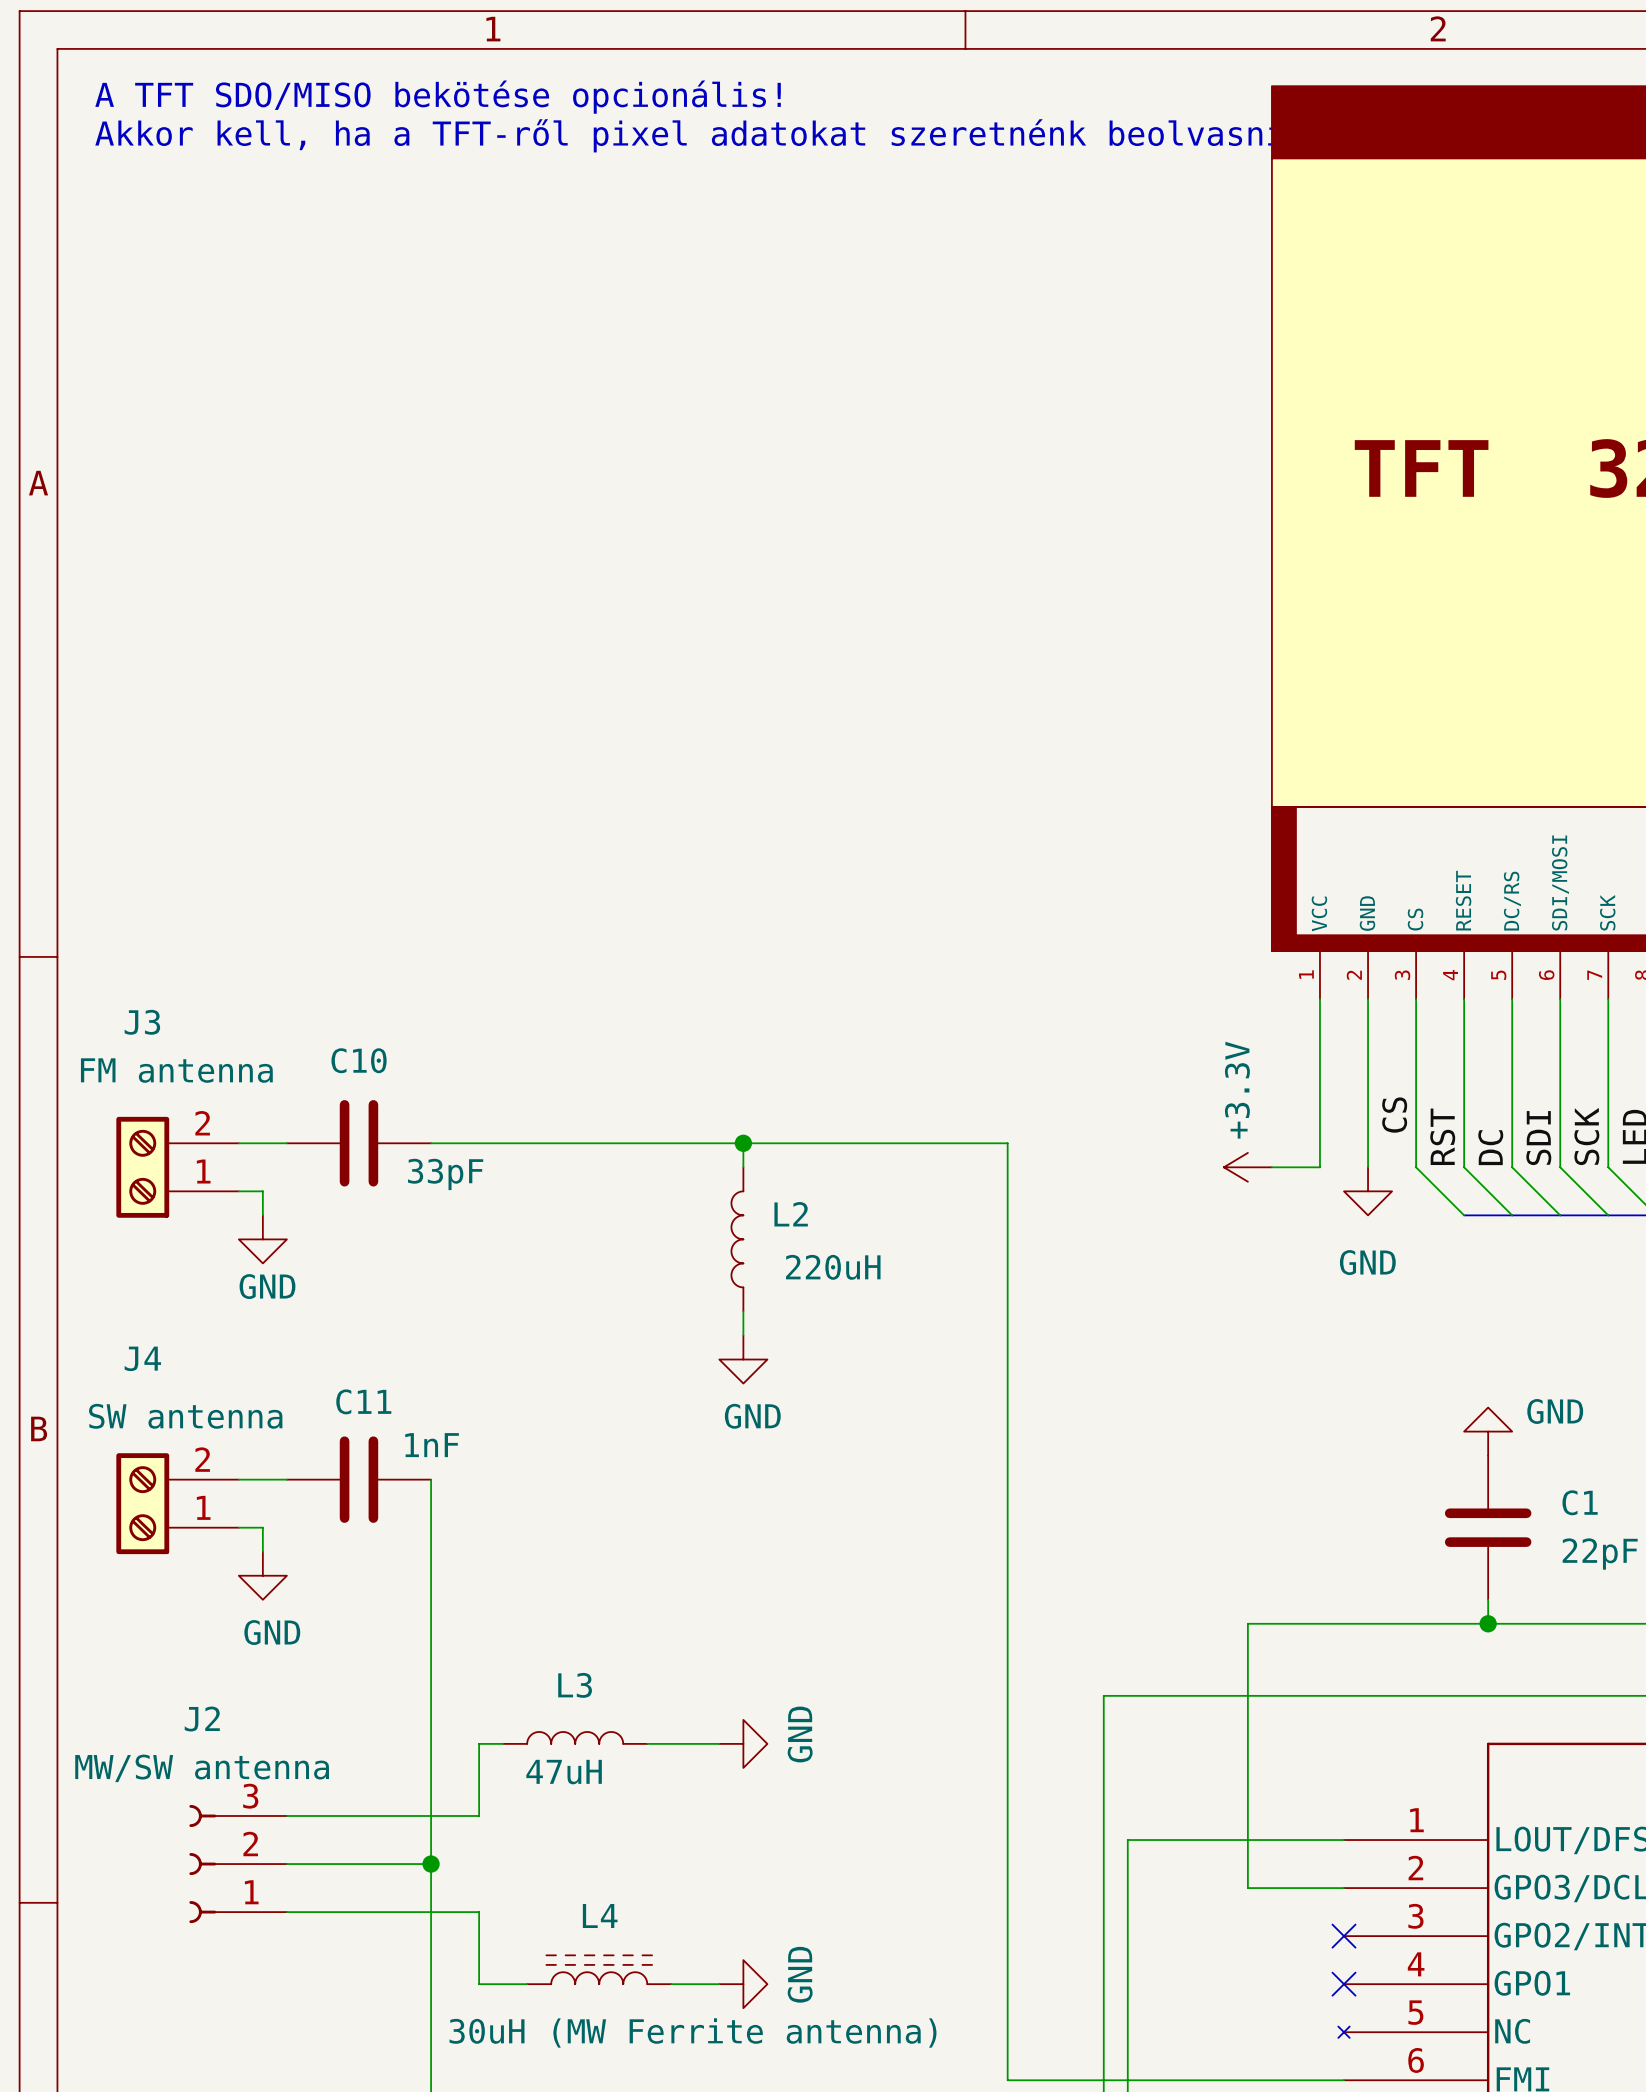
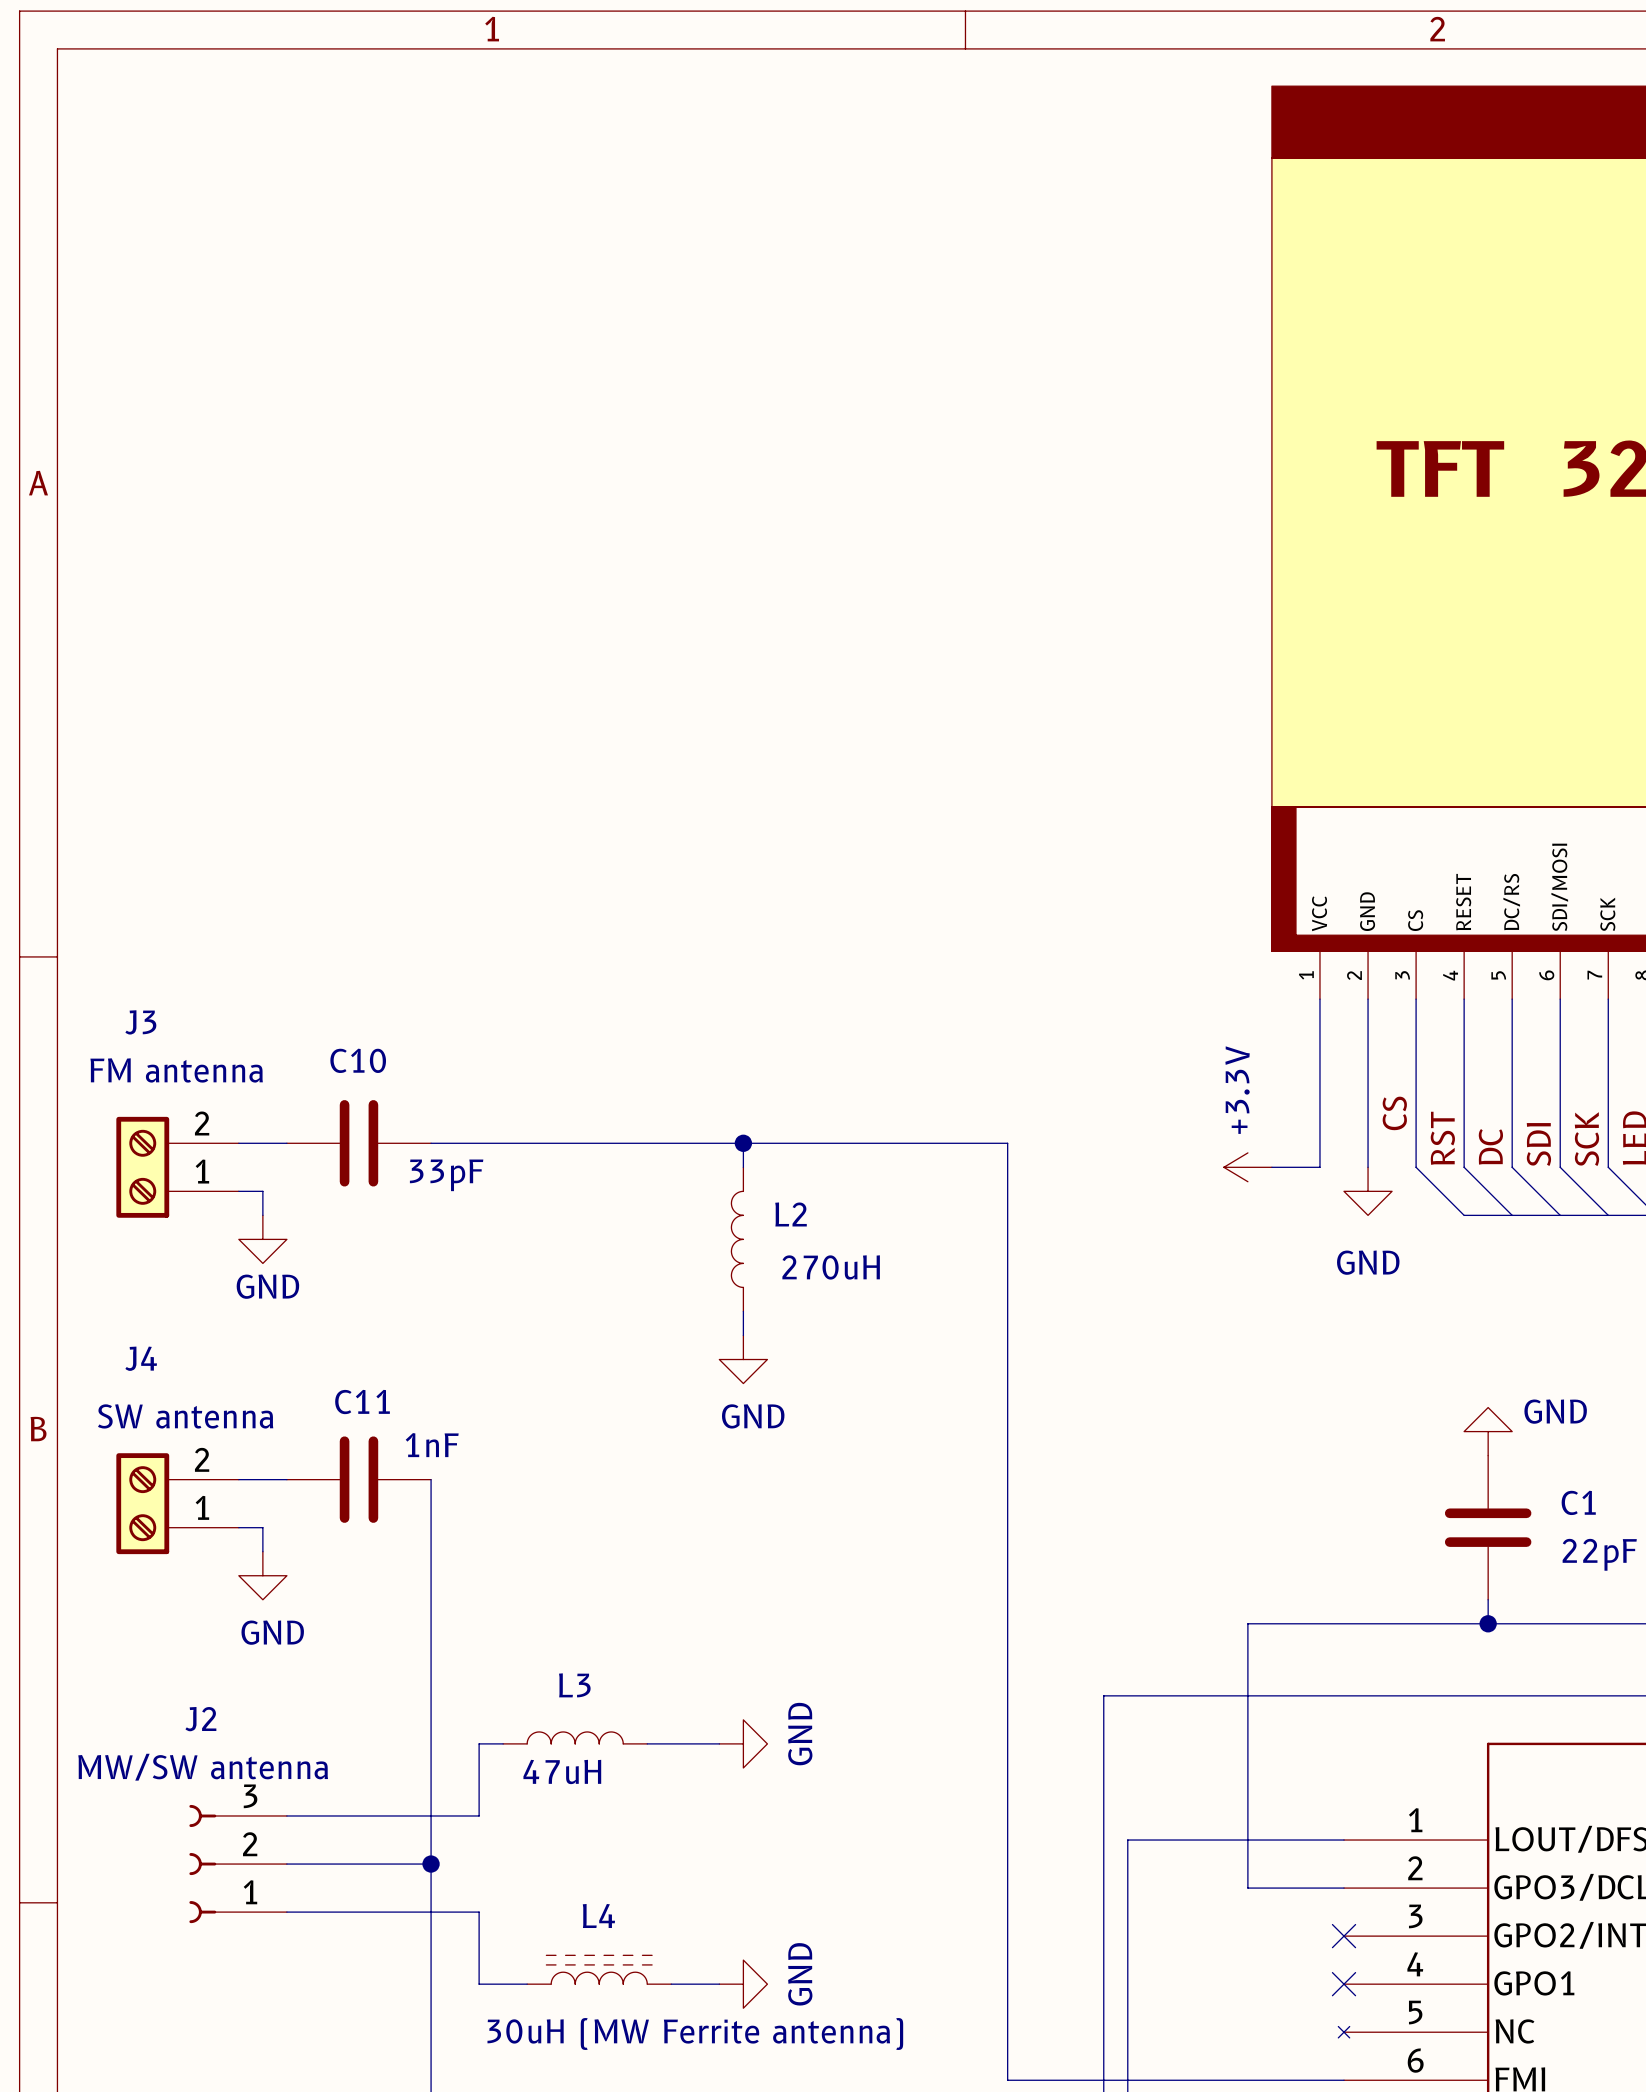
text: A TFT SDO/MISO bekötése opcionális! (438, 97) -> none
text: Akkor kell, ha a TFT-ről pixel adatokat szeretnénk beolvasni (689, 135) -> none
L2 value: 220uH (833, 1267) -> 270uH (831, 1267)

